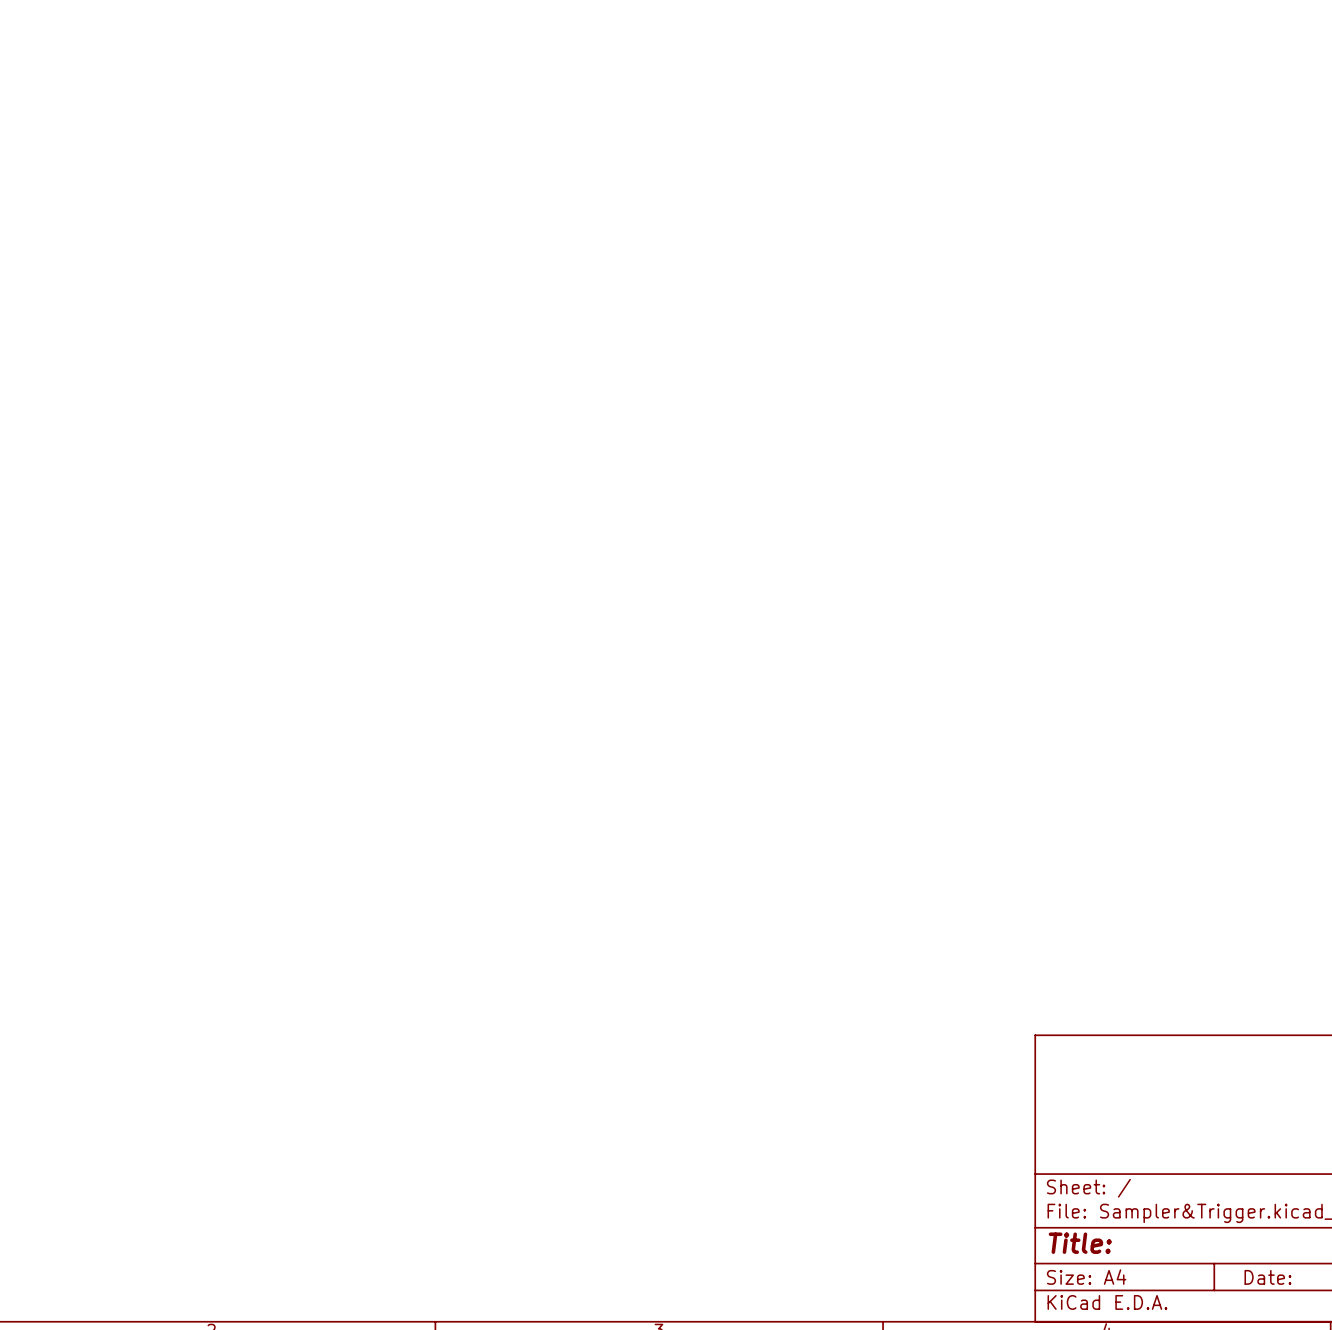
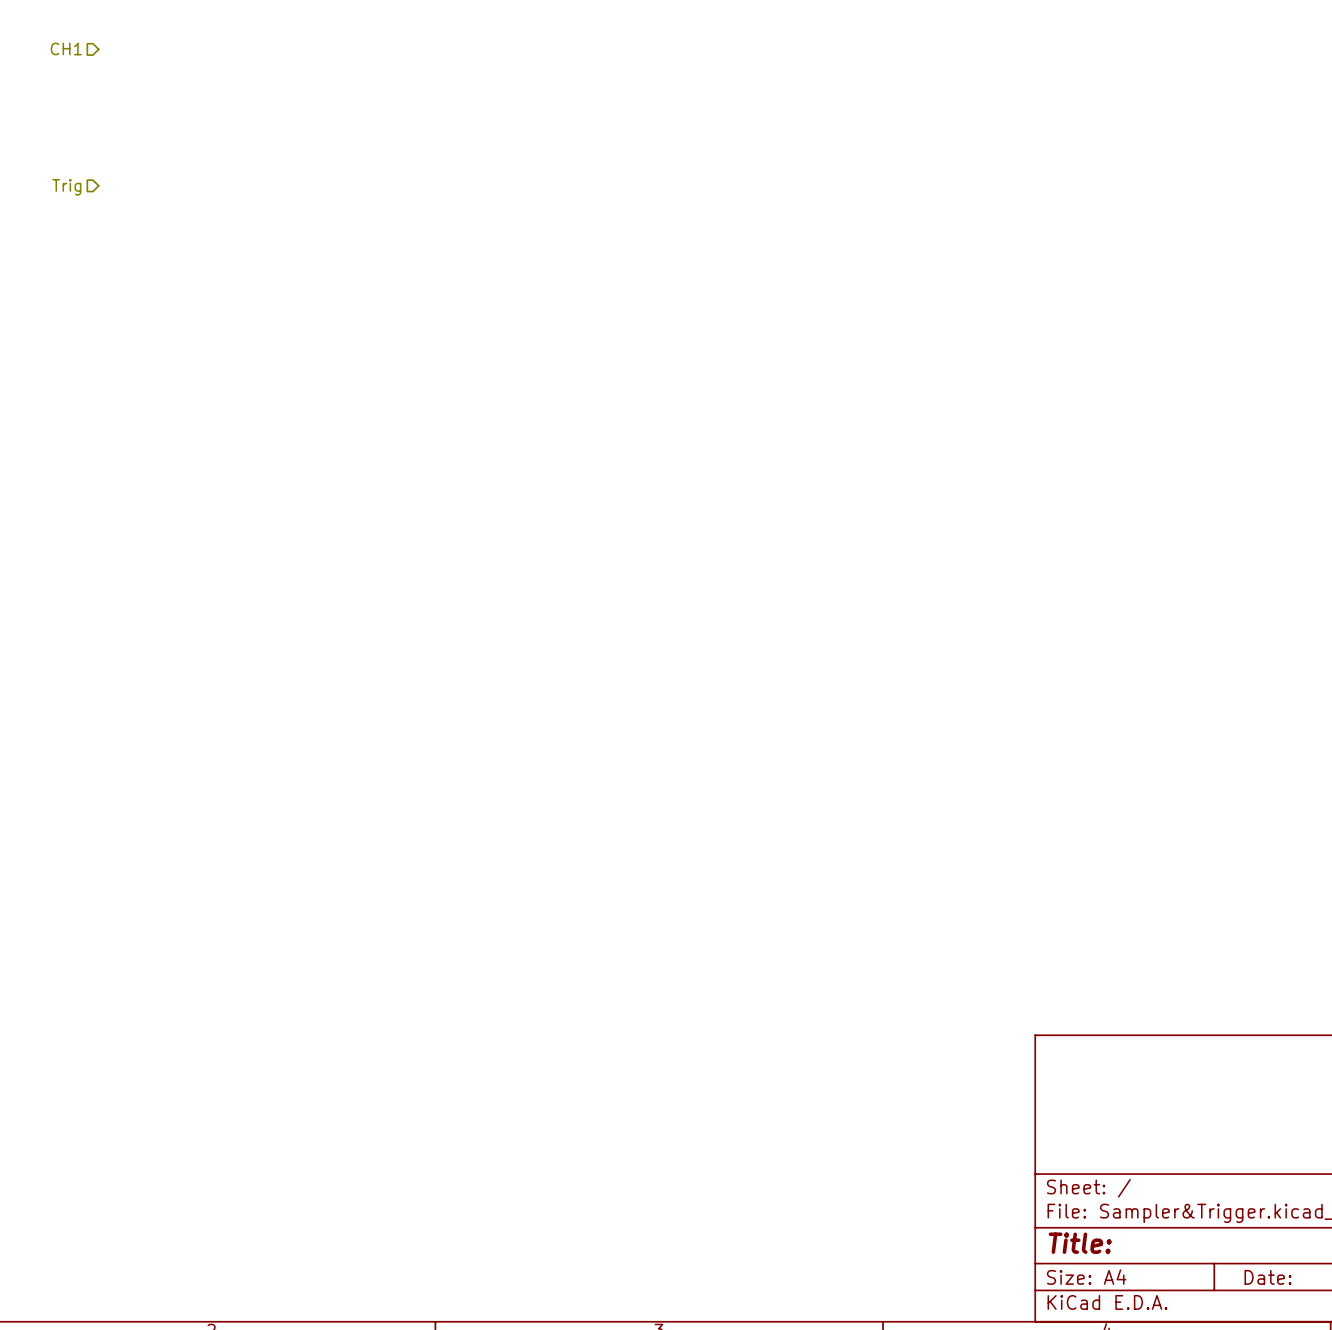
hierarchical label: none -> CH1 (66, 48)
hierarchical label: none -> Trig (66, 187)

